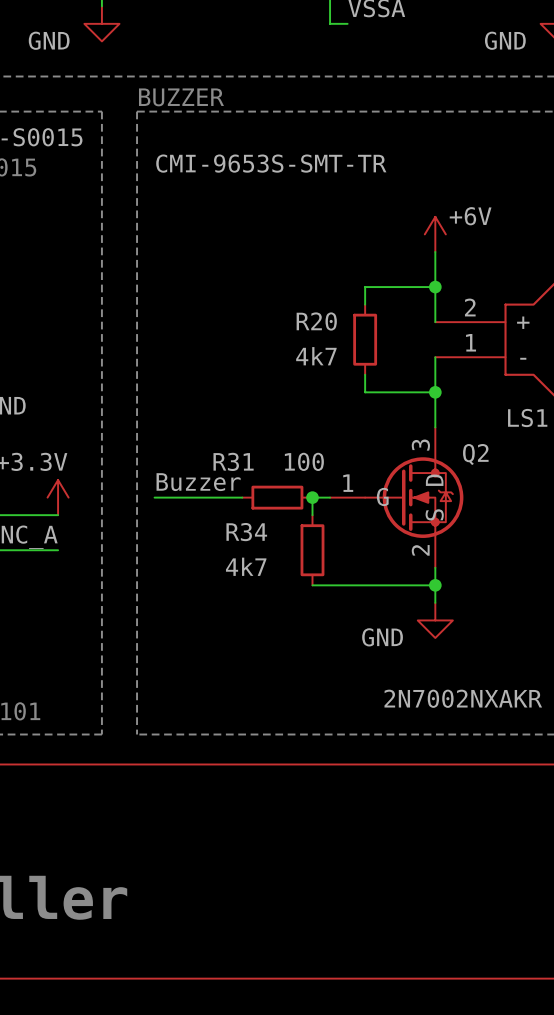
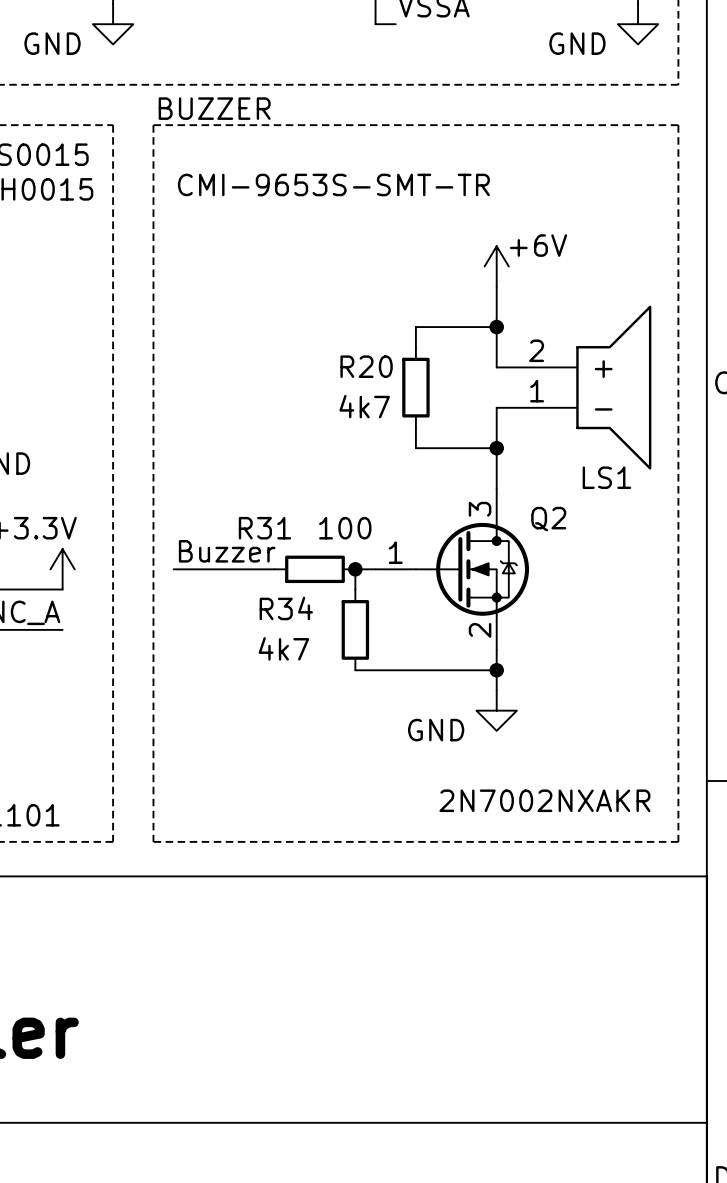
Q2 pin name: D (434, 480) -> none
Q2 pin name: G (382, 496) -> none
Q2 pin name: S (434, 514) -> none

